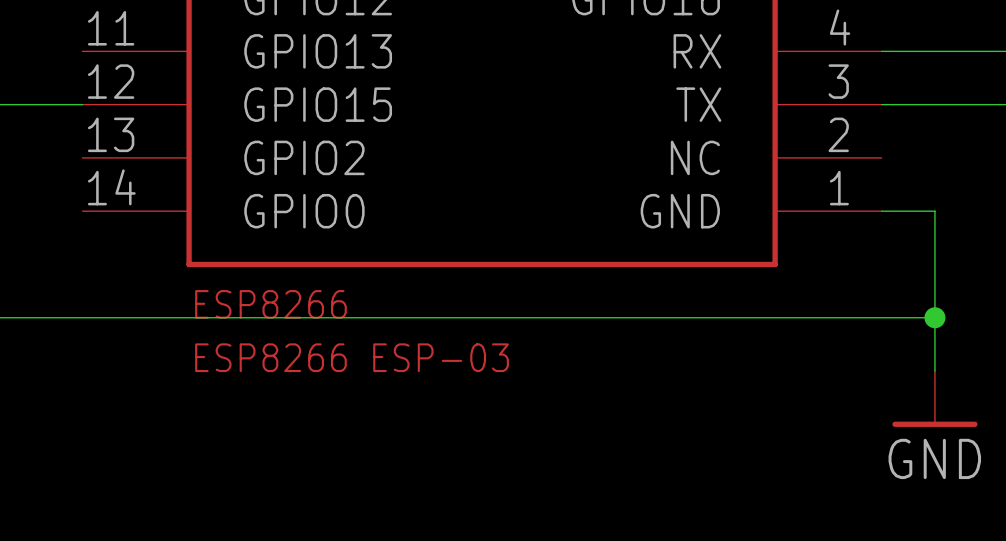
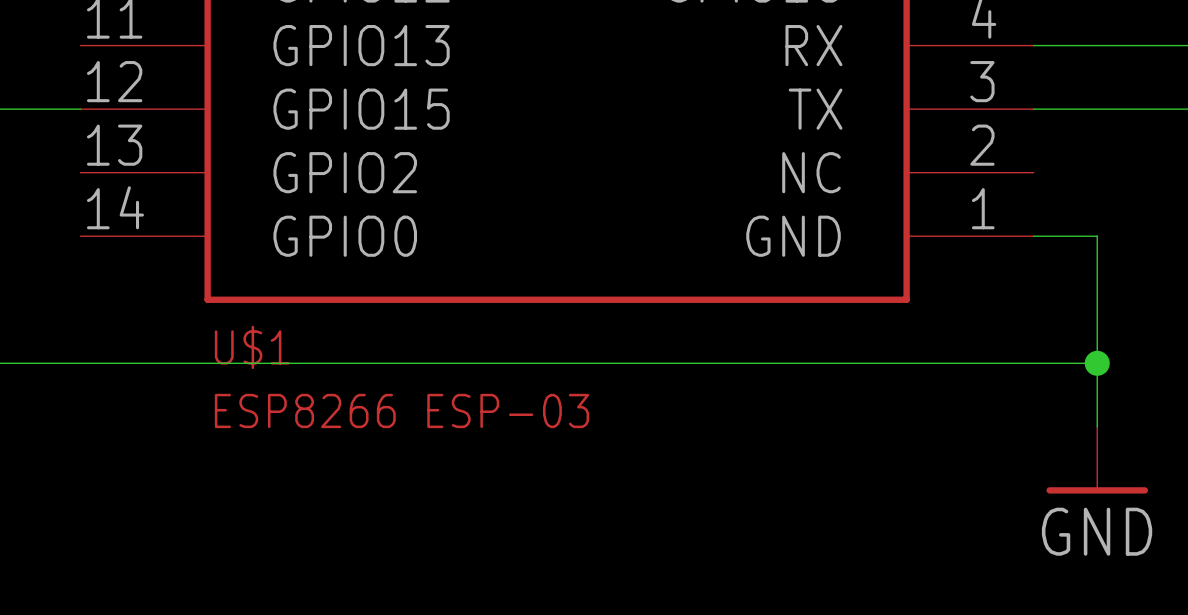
ESP8266 name: ESP8266 (270, 304) -> U$1 (252, 347)

